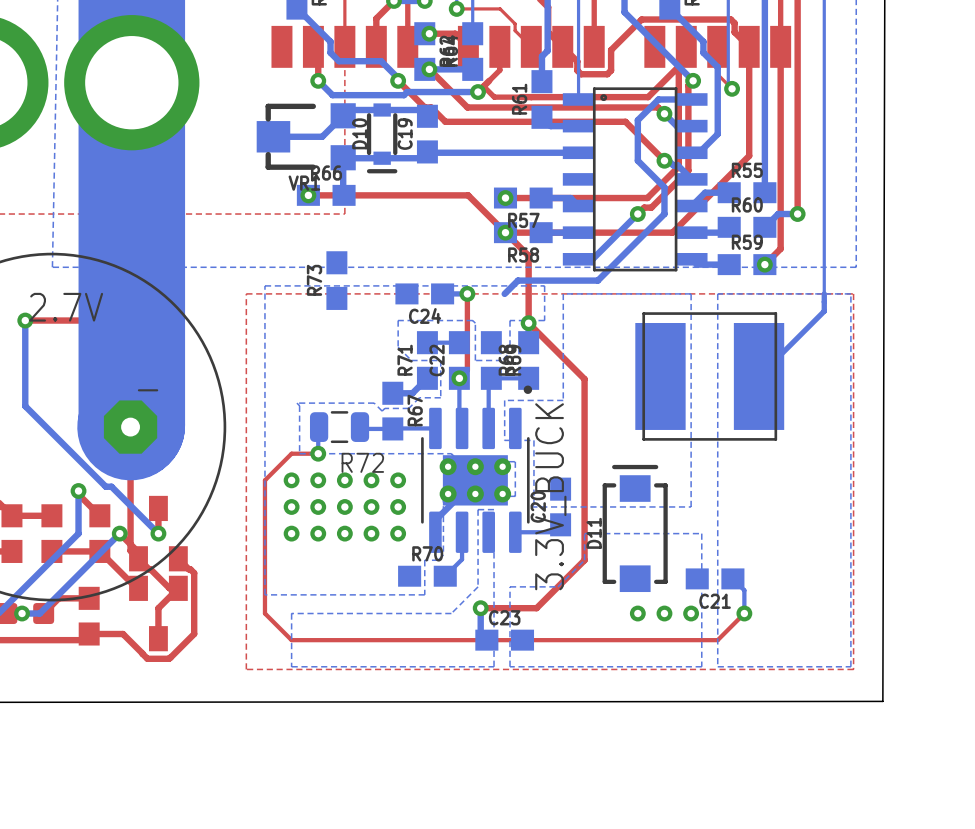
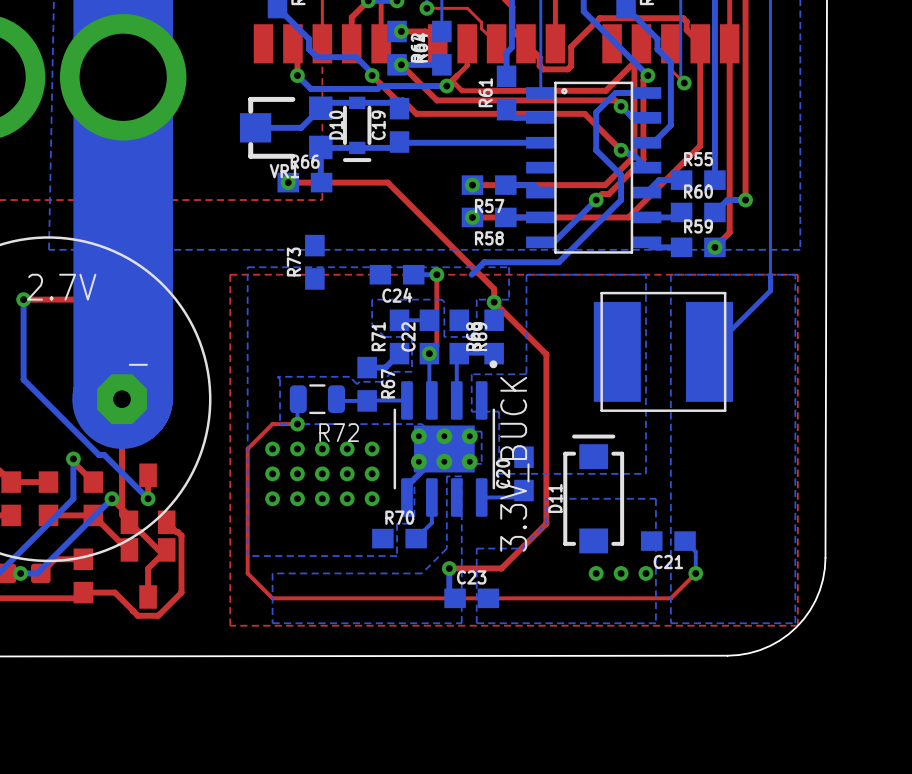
top track: (414, 195) (468, 195) (528, 255) (528, 309) -> (387, 182) (494, 288)
board edge: (883, 596) (882, 701) (778, 701) -> (825, 557) (822, 579) (815, 600) (796, 627) (779, 640) (759, 650) (727, 655)

